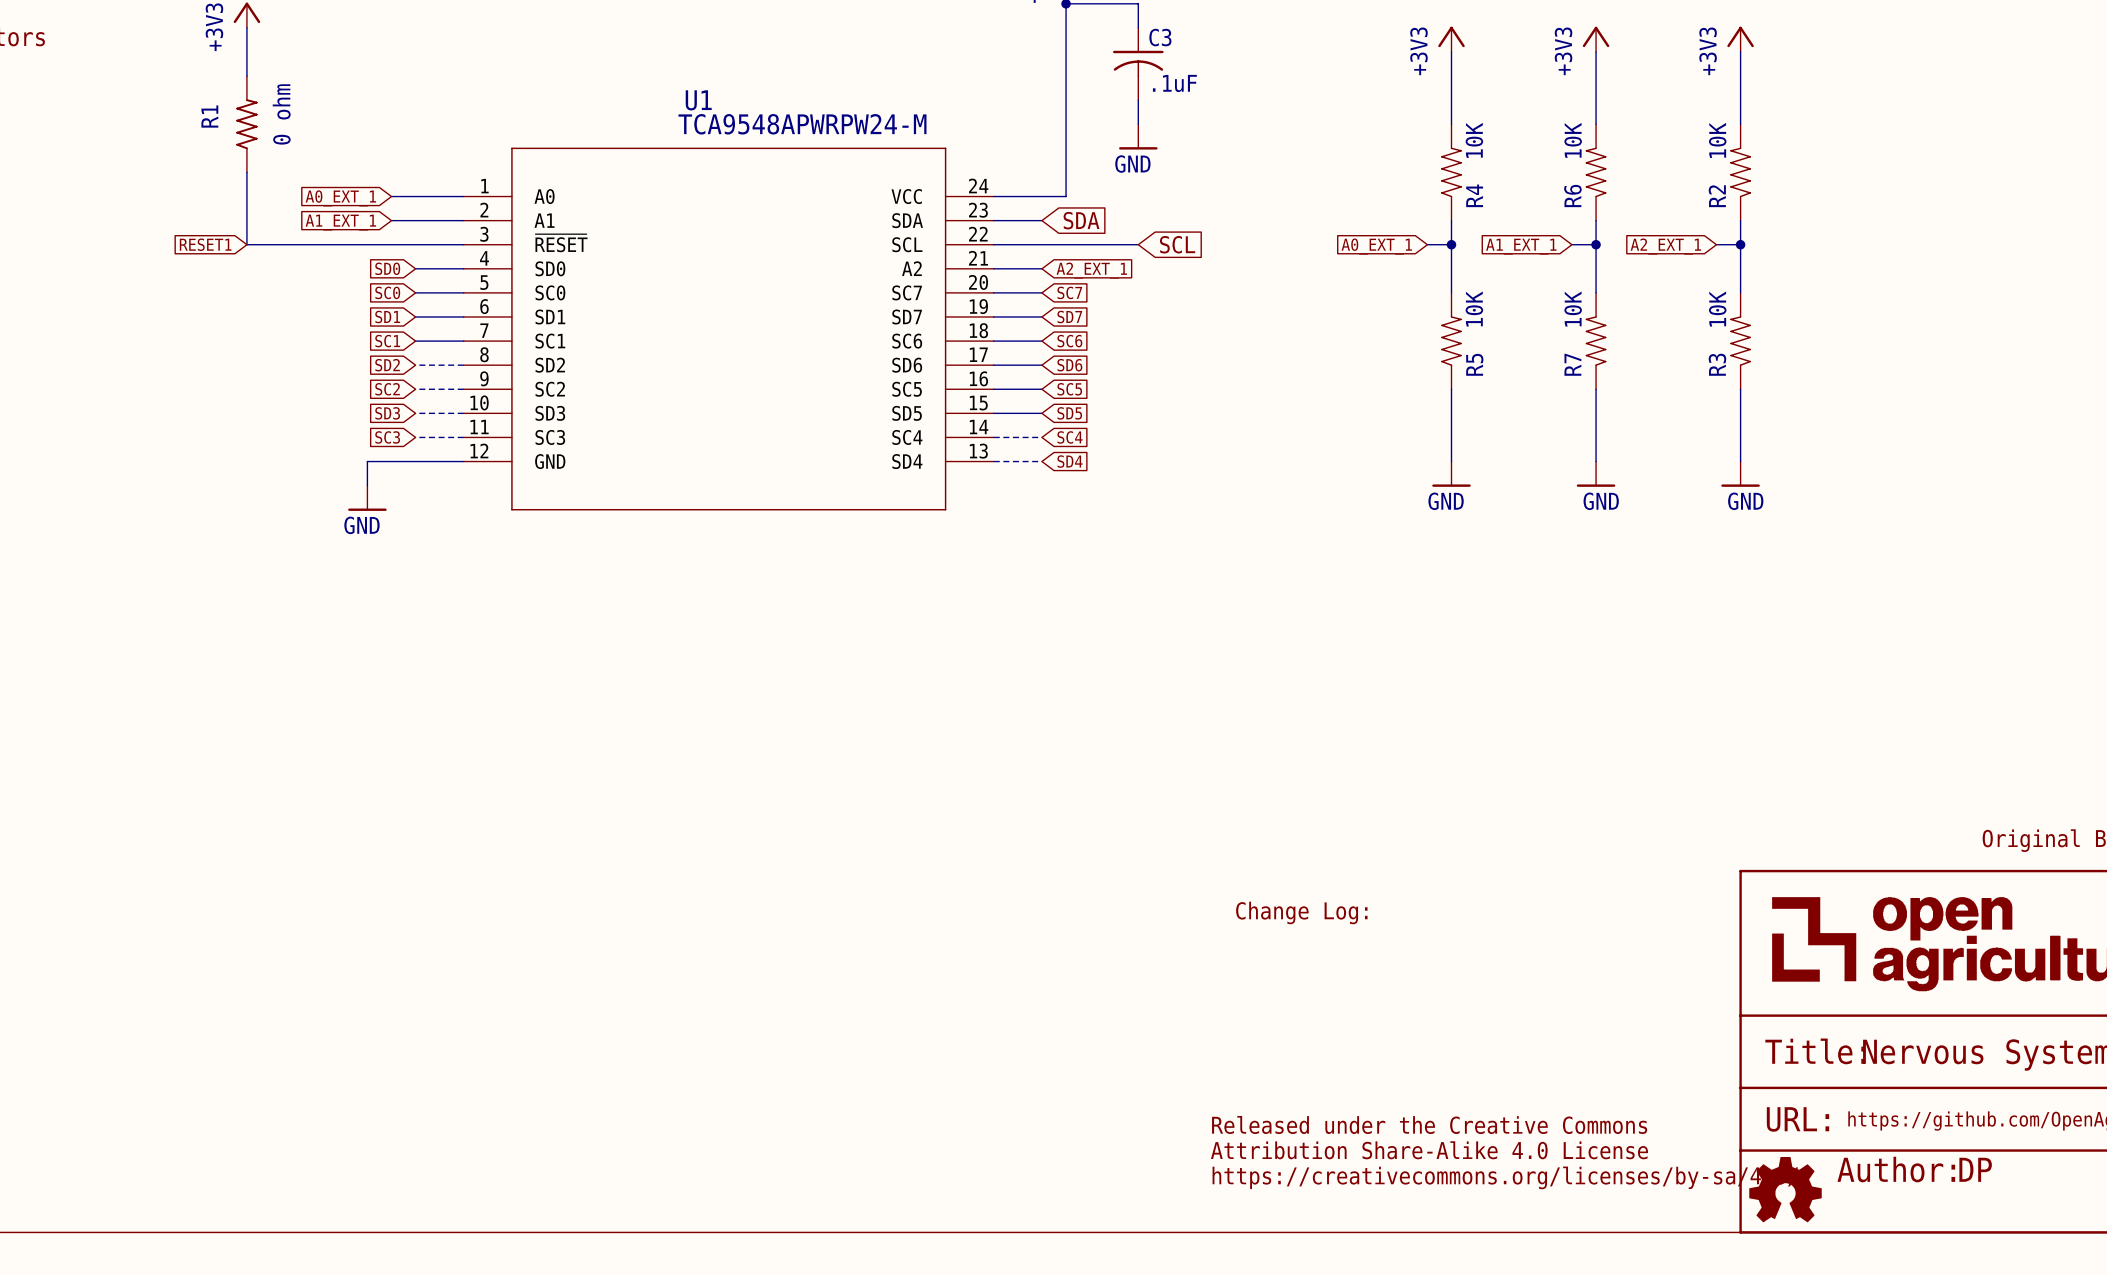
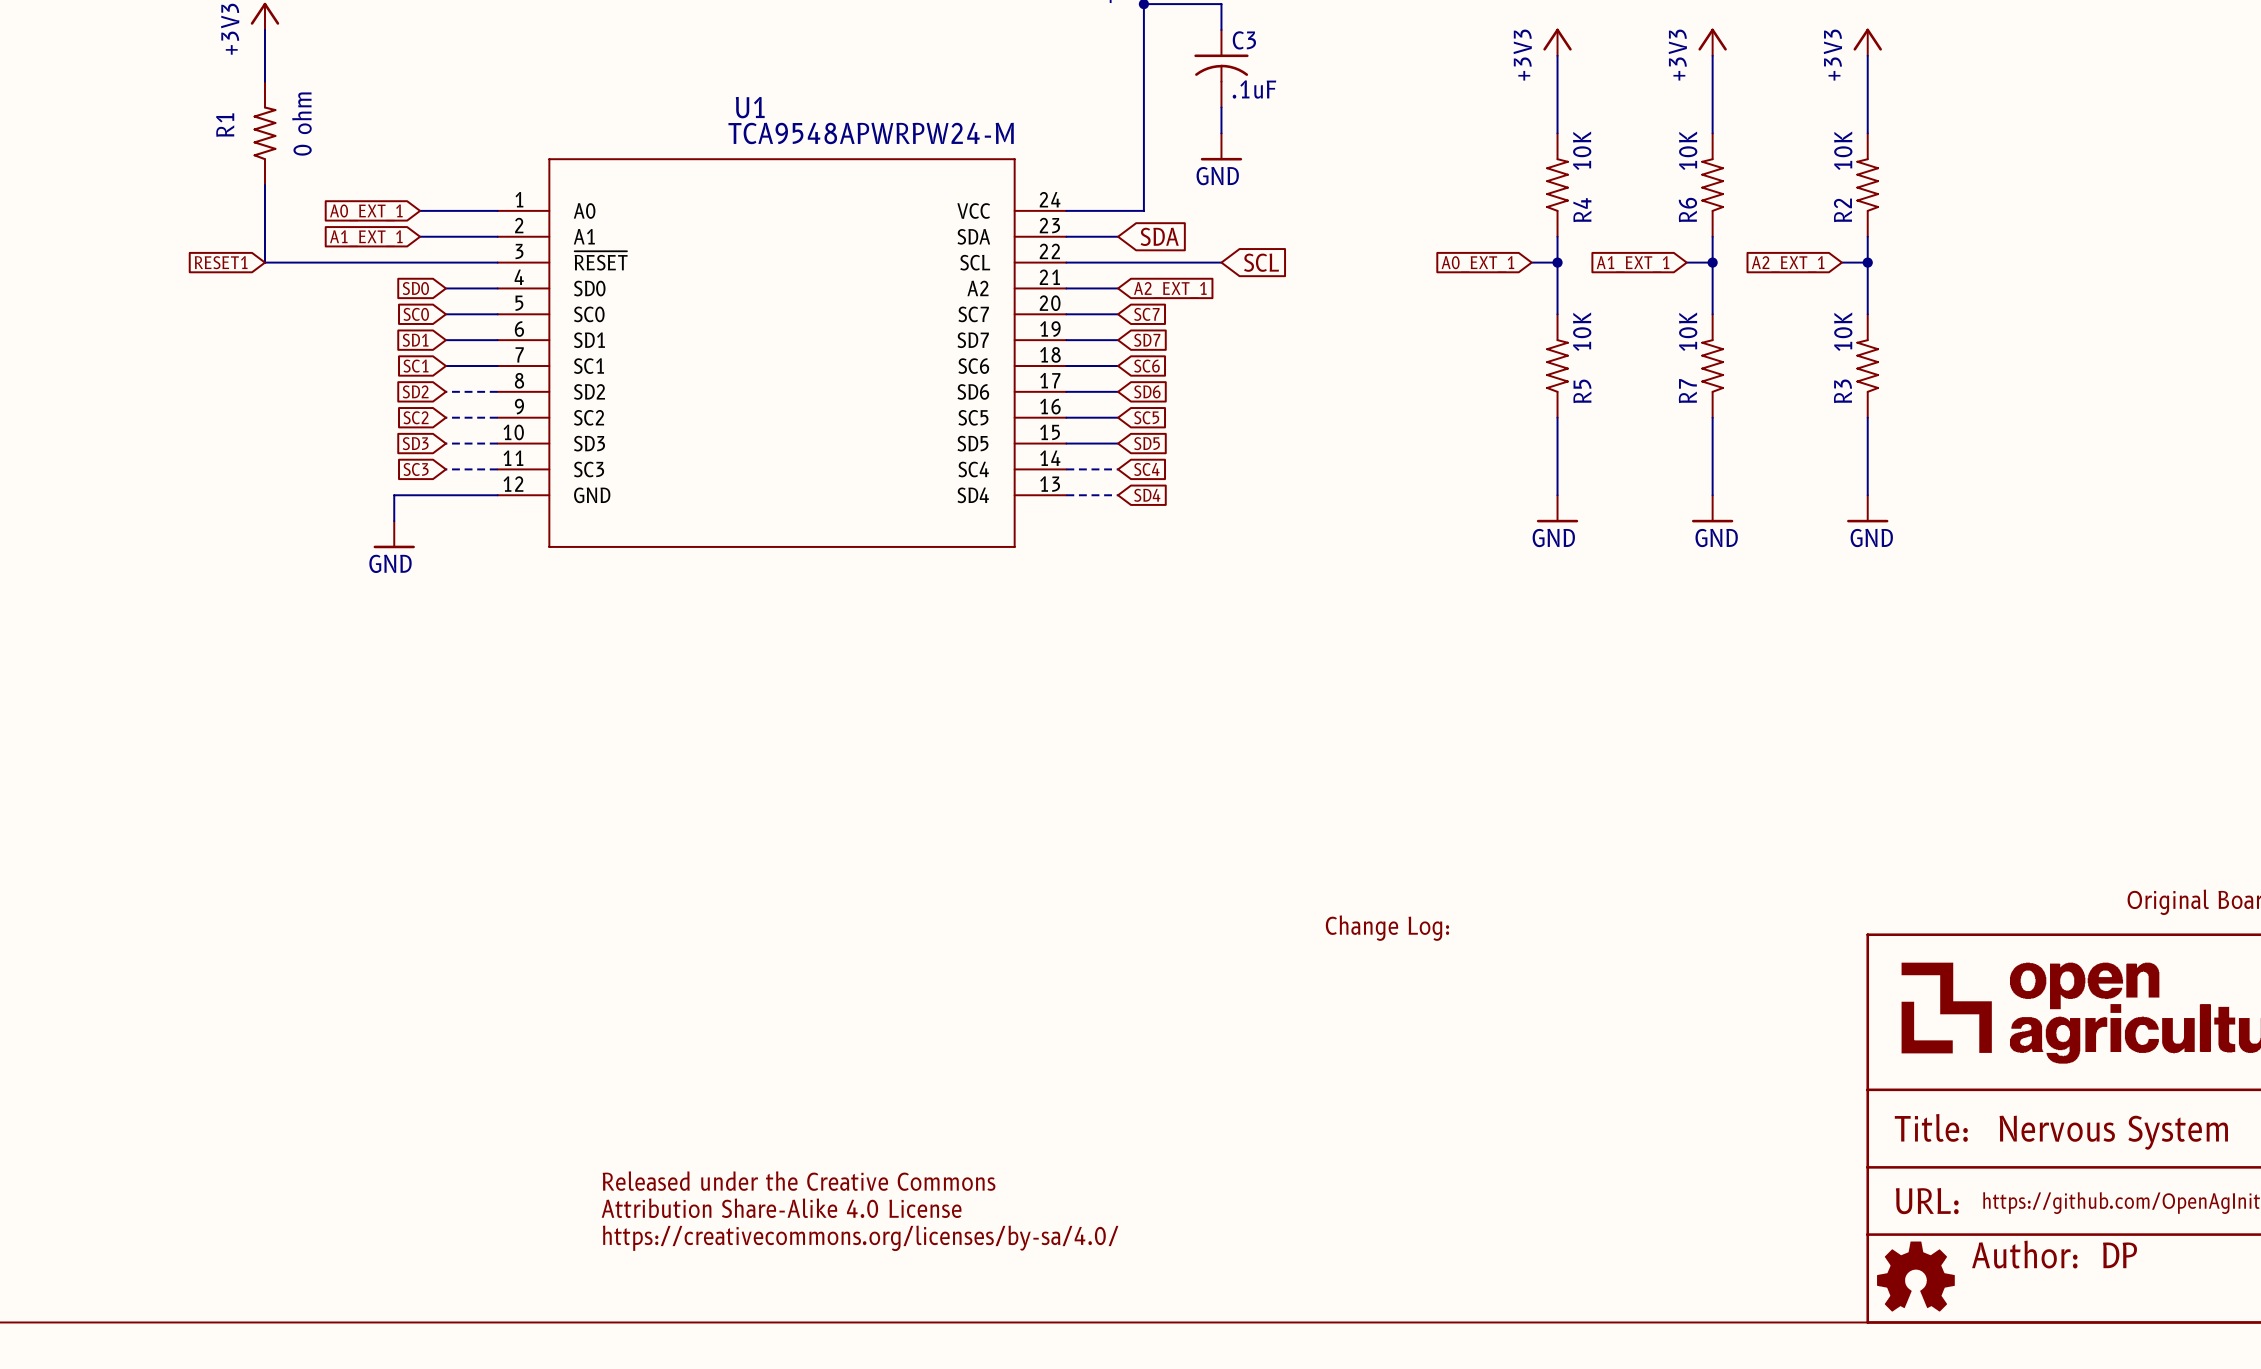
text position: Change Log: (1301, 912) -> Change Log: (1387, 928)
text: none -> Released under the Creative Commons (799, 1181)
text: Released under the Creative Commons (1429, 1124) -> none
text: none -> Attribution Share-Alike 4.0 License (781, 1208)
text: Attribution Share-Alike 4.0 License (1429, 1150) -> none
text: none -> https://creativecommons.org/licenses/by-sa/4.0/ (860, 1238)
text: https://creativecommons.org/licenses/by-sa/4.0/ (1505, 1177) -> none

